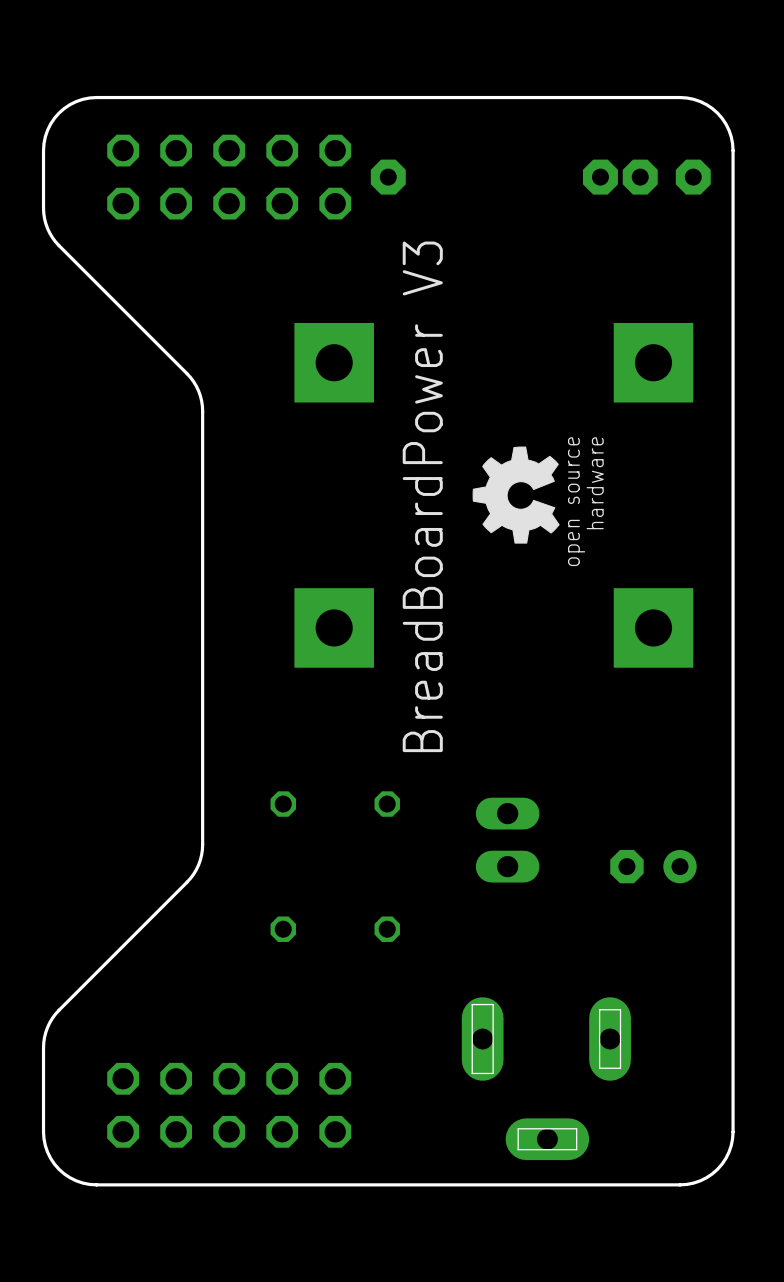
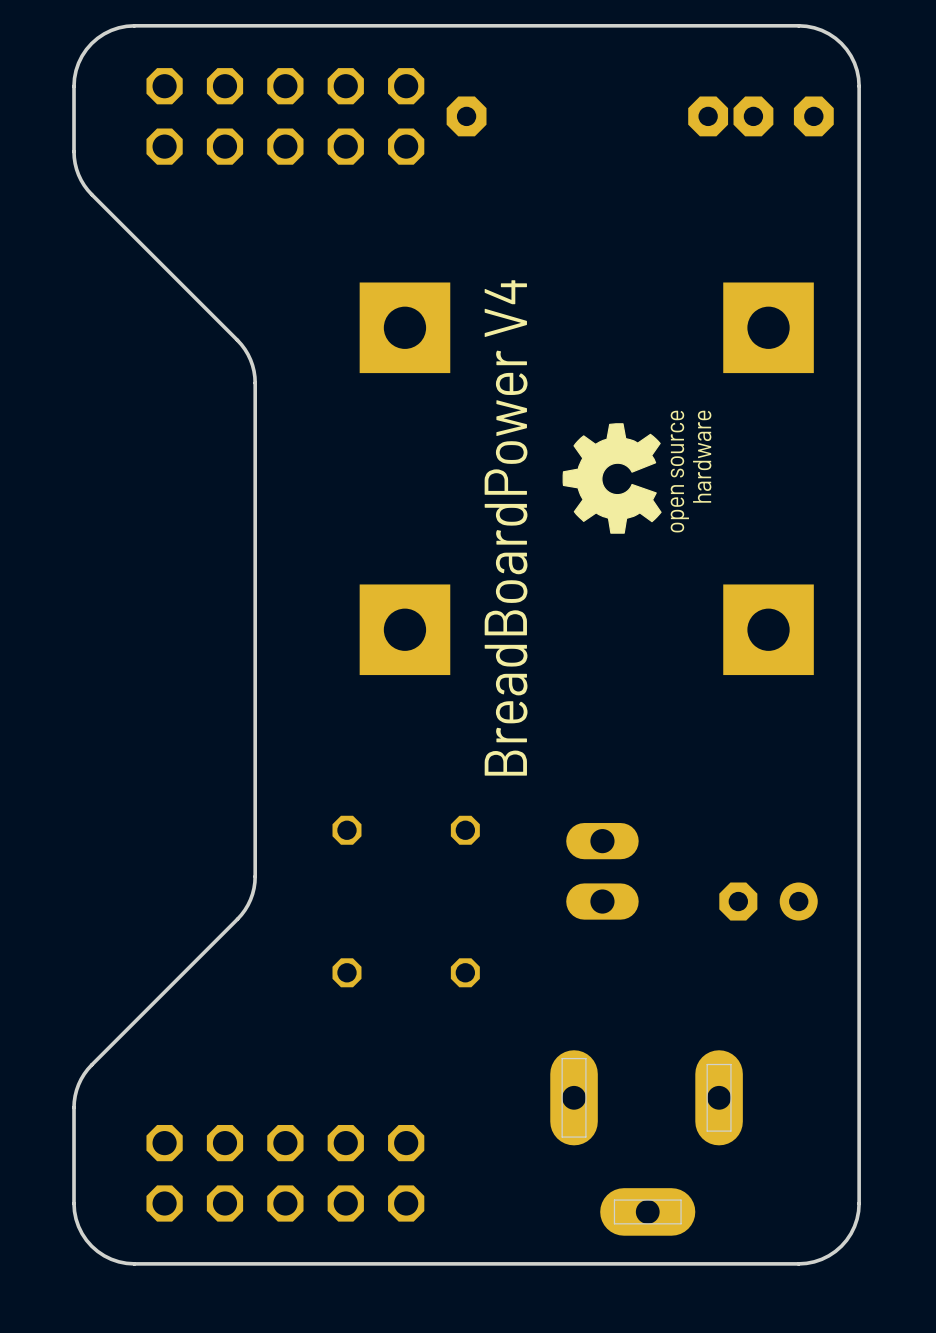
text: BreadBoardPower V3 (422, 496) -> BreadBoardPower V4 (506, 527)

